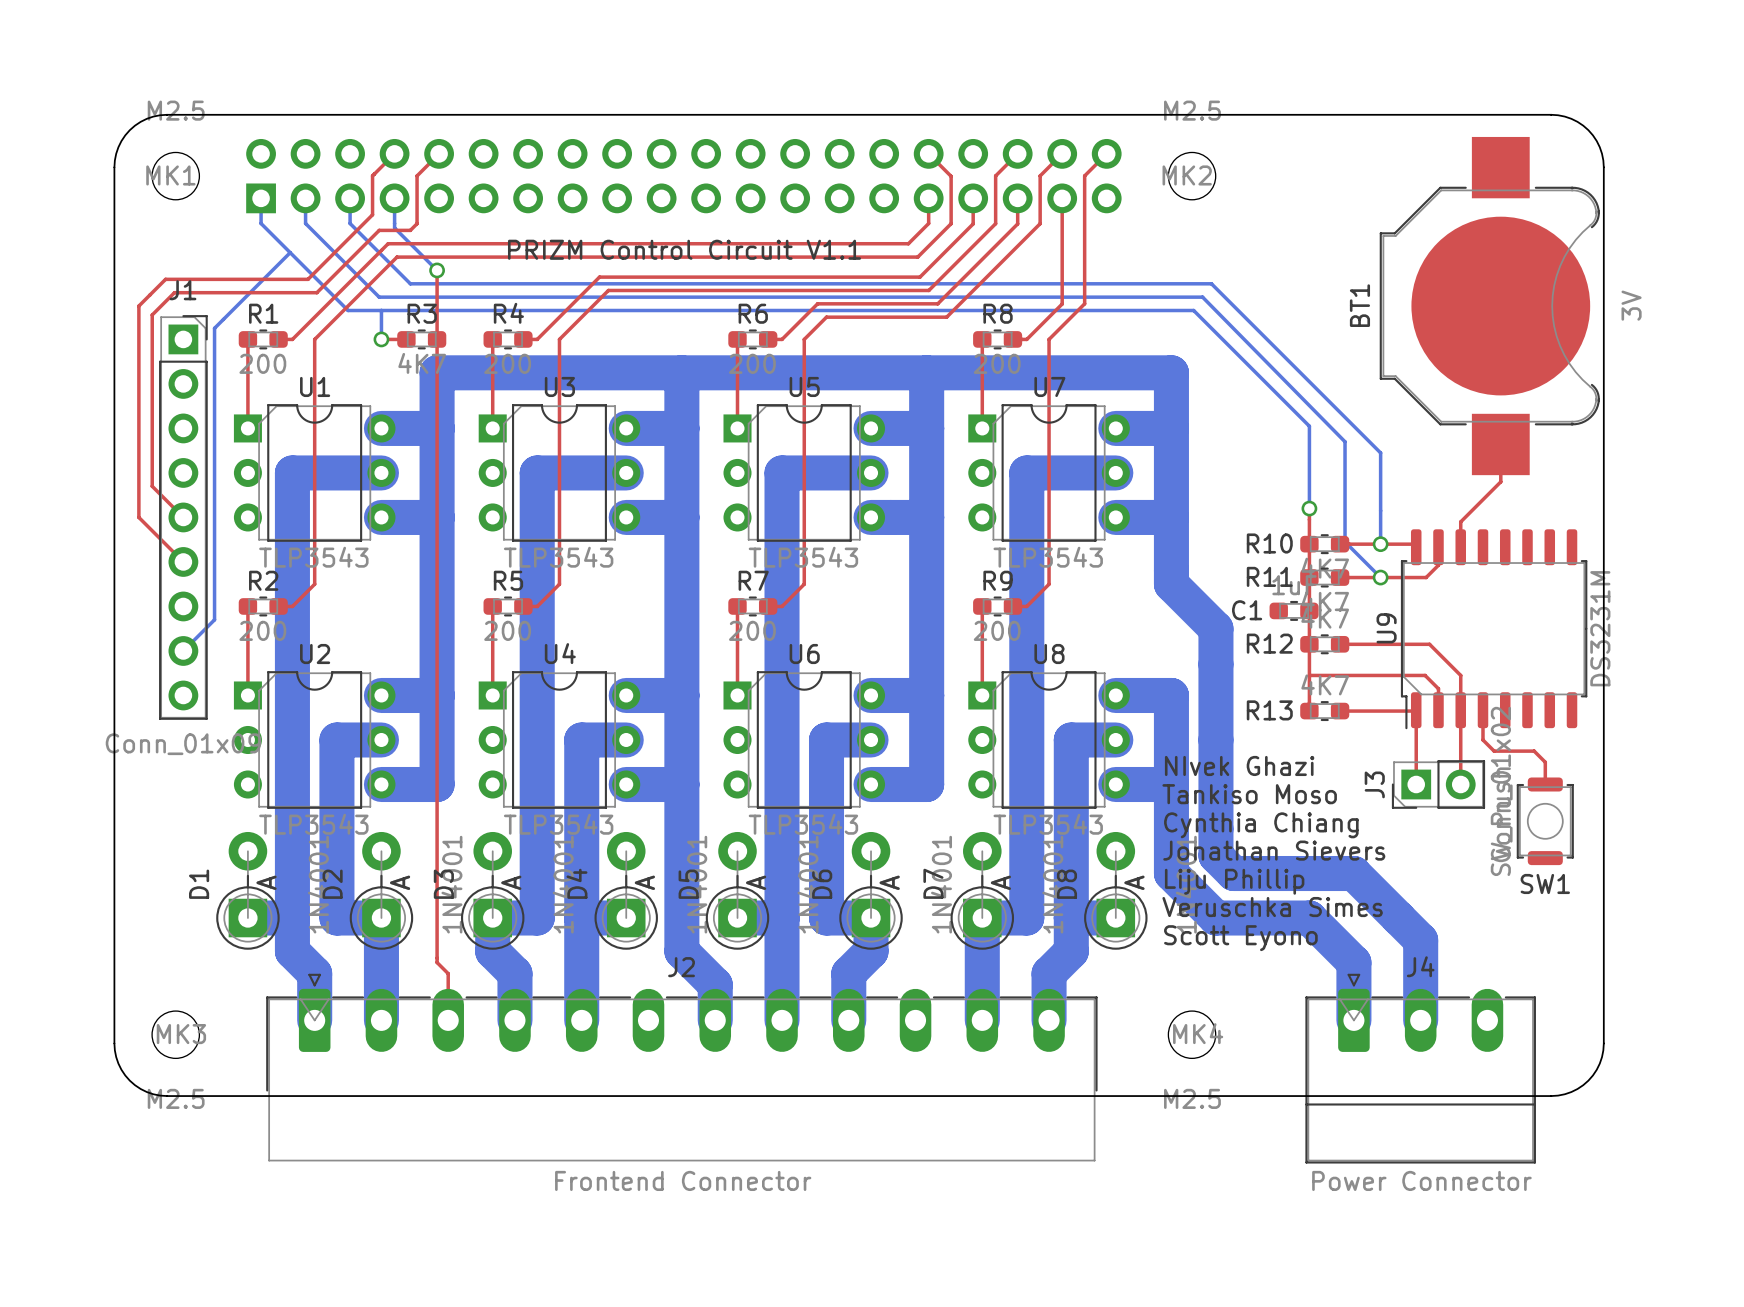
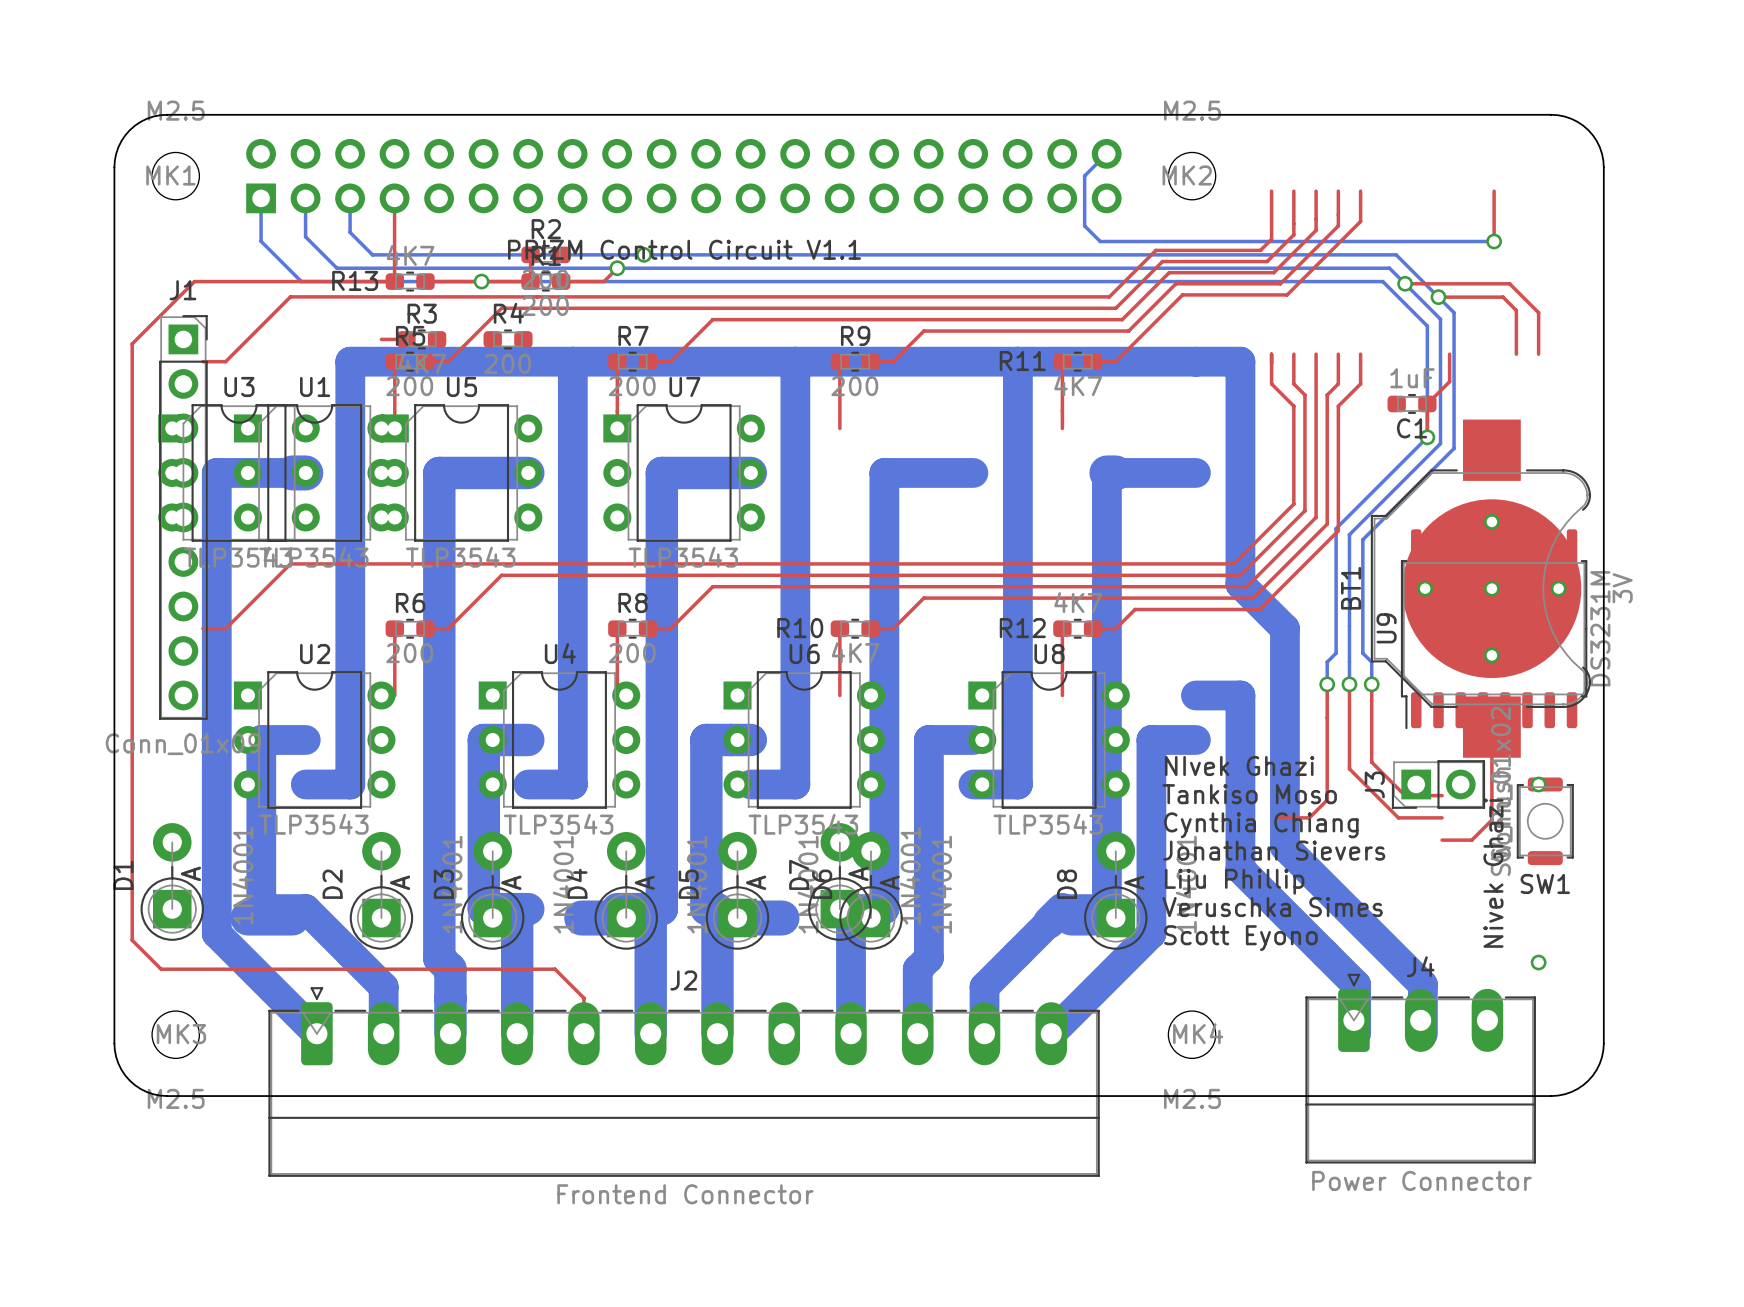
top track: (394, 153) (372, 175) (372, 214) (308, 279) (165, 279) (138, 306) (138, 517) (183, 561) -> none
top track: (439, 153) (417, 175) (417, 223) (410, 230) (379, 230) (316, 292) (174, 292) (152, 314) (152, 486) (183, 517) -> none
top track: (928, 153) (951, 176) (951, 223) (917, 257) (397, 257) (314, 339) (314, 584) (292, 606) (278, 606) -> none
top track: (1017, 153) (995, 175) (995, 223) (928, 290) (608, 290) (559, 339) (559, 584) (537, 606) (523, 606) -> none
top track: (1062, 153) (1040, 175) (1040, 223) (946, 317) (826, 317) (804, 339) (804, 584) (782, 606) (768, 606) -> none
top track: (1106, 153) (1084, 175) (1084, 303) (1049, 339) (1049, 584) (1026, 606) (1012, 606) -> none
bottom track: none -> (1106, 153) (1084, 175) (1084, 225) (1100, 241) (1494, 241)
top track: none -> (1271, 191) (1271, 239) (1260, 250) (1155, 250) (1109, 296) (290, 296) (225, 361) (202, 361)
top track: none -> (1293, 191) (1293, 234) (1267, 261) (1162, 261) (1115, 308) (501, 308) (448, 361) (425, 361)
top track: none -> (1316, 191) (1316, 230) (1273, 272) (1169, 272) (1122, 319) (712, 319) (670, 361) (648, 361)
top track: none -> (1338, 191) (1338, 225) (1280, 283) (1175, 283) (1128, 331) (923, 331) (893, 361) (870, 361)
top track: none -> (1360, 191) (1360, 221) (1287, 294) (1182, 294) (1115, 361) (1093, 361)
top track: none -> (1494, 191) (1494, 241)
top track: none -> (394, 198) (394, 281)
bottom track: (394, 198) (394, 227) (437, 270) -> none
top track: (928, 198) (928, 223) (908, 243) (388, 243) (292, 339) (278, 339) -> none
top track: (973, 198) (973, 223) (919, 277) (599, 277) (537, 339) (523, 339) -> none
top track: (1017, 198) (1017, 223) (937, 303) (817, 303) (782, 339) (768, 339) -> none
top track: (1062, 198) (1062, 304) (1026, 339) (1012, 339) -> none
bottom track: (261, 223) (348, 310) (1193, 310) (1309, 426) (1309, 508) -> (261, 223) (261, 241) (301, 281) (1382, 281) (1427, 326) (1427, 437) (1336, 528) (1336, 653) (1327, 662) (1327, 684)
bottom track: (305, 223) (379, 297) (1202, 297) (1345, 441) (1345, 541) (1380, 577) -> (305, 223) (305, 236) (336, 268) (1389, 268) (1440, 319) (1440, 443) (1349, 534) (1349, 684)
bottom track: (350, 223) (410, 283) (1211, 283) (1380, 452) (1380, 544) -> (350, 223) (350, 232) (372, 254) (1396, 254) (1454, 312) (1454, 448) (1362, 539) (1362, 653) (1371, 662) (1371, 684)
via: none -> (1494, 241)
bottom track: (290, 252) (214, 328) (214, 619) (183, 650) -> none
top track: none -> (530, 254) (530, 281) (425, 281)
via: none -> (644, 254)
top track: none -> (617, 268) (603, 281) (561, 281)
via: none -> (617, 268)
top track: (437, 270) (437, 962) (448, 973) (448, 1020) -> none
via position: (437, 270) -> (481, 281)
top track: none -> (394, 281) (194, 281) (132, 343) (132, 940) (161, 969) (555, 969) (583, 998) (583, 1033)
top track: none -> (1405, 283) (1509, 283) (1538, 312) (1538, 354)
via: none -> (1405, 283)
top track: none -> (1438, 297) (1503, 297) (1516, 310) (1516, 354)
via: none -> (1438, 297)
BT1 position: (1489, 306) -> (1480, 588)
bottom track: (381, 310) (381, 339) -> none
top track: (247, 339) (247, 428) -> none
R1 position: (263, 339) -> (545, 281)
via: (381, 339) -> none
top track: (492, 339) (492, 428) -> none
top track: (737, 339) (737, 428) -> none
R6 position: (752, 339) -> (410, 628)
top track: (982, 339) (982, 428) -> none
R8 position: (997, 339) -> (632, 628)
top track: none -> (1271, 354) (1271, 383) (1293, 406) (1293, 504) (1234, 563) (290, 563) (225, 628) (202, 628)
top track: none -> (1293, 354) (1293, 383) (1304, 395) (1304, 510) (1240, 575) (501, 575) (448, 628) (425, 628)
top track: none -> (1316, 354) (1316, 517) (1246, 586) (712, 586) (670, 628) (648, 628)
top track: none -> (1338, 354) (1338, 383) (1327, 395) (1327, 524) (1253, 598) (923, 598) (893, 628) (870, 628)
top track: none -> (1360, 354) (1360, 383) (1338, 406) (1338, 530) (1259, 609) (1135, 609) (1115, 628) (1093, 628)
top track: none -> (1449, 354) (1449, 381) (1427, 403) (1427, 437)
top track: none -> (394, 361) (394, 428)
bottom track: none -> (572, 361) (572, 784) (528, 784)
top track: none -> (617, 361) (617, 428)
bottom track: none -> (795, 361) (795, 784) (750, 784)
top track: none -> (839, 361) (839, 428)
bottom track: none -> (1017, 361) (1017, 784) (973, 784)
top track: none -> (1062, 361) (1062, 428)
bottom track: (681, 372) (681, 951) (715, 984) (715, 1020) -> none
bottom track: (926, 372) (926, 784) (871, 784) -> none
bottom track: (381, 428) (437, 428) -> none
bottom track: (626, 428) (681, 428) -> none
bottom track: (871, 428) (926, 428) -> none
bottom track: (1115, 428) (1171, 428) -> none
via: none -> (1427, 437)
top track: (1500, 444) (1500, 481) (1460, 521) (1460, 547) -> none
bottom track: (292, 472) (292, 951) (314, 973) (314, 1020) -> (292, 472) (216, 472) (216, 933) (316, 1033)
bottom track: (305, 472) (381, 472) -> none
bottom track: none -> (528, 472) (439, 472) (439, 958) (450, 969) (450, 1033)
U3 position: (559, 472) -> (239, 472)
bottom track: (626, 472) (537, 472) (537, 918) (492, 918) (492, 951) (514, 973) (514, 1020) -> none
bottom track: none -> (750, 472) (661, 472) (661, 909) (617, 909)
U5 position: (804, 472) -> (461, 472)
bottom track: (871, 472) (782, 472) (782, 1020) -> none
bottom track: none -> (973, 472) (884, 472) (884, 909) (850, 909)
U7 position: (1049, 472) -> (684, 472)
bottom track: (1106, 472) (1026, 472) (1026, 918) (982, 918) (982, 1020) -> (1106, 472) (1106, 909) (1062, 909) (984, 987) (984, 1033)
bottom track: none -> (1115, 472) (1195, 472)
top track: (1309, 508) (1309, 711) -> none
via: (1309, 508) -> none
bottom track: (381, 517) (437, 517) -> none
bottom track: (626, 517) (681, 517) -> none
bottom track: (871, 517) (926, 517) -> none
bottom track: (1115, 517) (1171, 517) -> none
via: none -> (1491, 521)
R10 position: (1324, 544) -> (855, 628)
top track: (1340, 544) (1413, 544) (1416, 547) -> none
via: (1380, 544) -> none
top track: (1438, 547) (1438, 565) (1426, 577) (1340, 577) -> none
R11 position: (1324, 577) -> (1077, 361)
via: (1380, 577) -> none
via: none -> (1425, 588)
via: none -> (1491, 588)
via: none -> (1558, 588)
top track: (247, 606) (247, 695) -> none
R2 position: (263, 606) -> (545, 254)
top track: (492, 606) (492, 695) -> none
R5 position: (508, 606) -> (410, 361)
top track: (737, 606) (737, 695) -> none
R7 position: (752, 606) -> (632, 361)
top track: (982, 606) (982, 695) -> none
R9 position: (997, 606) -> (855, 361)
C1 name position: C1 (1247, 610) -> C1 (1412, 428)
C1 position: (1294, 610) -> (1412, 403)
top track: none -> (394, 628) (394, 695)
top track: none -> (617, 628) (617, 695)
top track: none -> (839, 628) (839, 695)
top track: none -> (1062, 628) (1062, 695)
R12 position: (1324, 644) -> (1077, 628)
top track: (1340, 644) (1429, 644) (1460, 675) (1460, 784) -> none
via: none -> (1491, 655)
top track: (1309, 675) (1425, 675) (1438, 688) (1438, 710) -> none
top track: none -> (1327, 684) (1327, 800) (1309, 817) (1279, 817)
via: none -> (1327, 684)
top track: none -> (1349, 684) (1349, 768) (1398, 817) (1442, 817)
via: none -> (1349, 684)
top track: none -> (1371, 684) (1371, 762) (1405, 795) (1442, 795)
via: none -> (1371, 684)
bottom track: (381, 695) (437, 695) -> none
bottom track: (626, 695) (681, 695) -> none
bottom track: (871, 695) (926, 695) -> none
bottom track: (1115, 695) (1171, 695) (1171, 873) (1215, 918) (1309, 918) (1353, 962) (1353, 1020) -> none
bottom track: none -> (1195, 695) (1240, 695) (1240, 869) (1356, 984) (1356, 1033)
top track: (1416, 710) (1416, 784) -> none
top track: (1416, 710) (1340, 711) -> none
top track: (1482, 710) (1482, 739) (1494, 751) (1534, 751) (1545, 762) (1545, 784) -> none
R13 position: (1324, 711) -> (410, 281)
top track: none -> (1491, 727) (1491, 820) (1471, 840) (1442, 840)
bottom track: none -> (305, 739) (261, 739) (261, 909) (305, 909) (383, 987) (383, 1033)
bottom track: (381, 739) (336, 739) (336, 918) (381, 918) (381, 1020) -> none
bottom track: none -> (528, 739) (483, 739) (483, 909) (528, 909)
bottom track: (626, 739) (581, 739) (581, 1020) -> none
bottom track: none -> (750, 739) (706, 739) (706, 909) (717, 909) (717, 1033)
bottom track: (871, 739) (826, 739) (826, 918) (871, 918) (871, 951) (848, 973) (848, 1020) -> none
bottom track: none -> (973, 739) (928, 739) (928, 958) (917, 969) (917, 1033)
bottom track: (1115, 739) (1071, 739) (1071, 951) (1049, 973) (1049, 1020) -> none
bottom track: none -> (1195, 739) (1151, 739) (1151, 933) (1051, 1033)
bottom track: none -> (305, 784) (350, 784) (350, 361) (1240, 361) (1240, 584) (1284, 628) (1284, 846) (1422, 984) (1422, 1033)
bottom track: (381, 784) (437, 784) (437, 372) (1171, 372) (1171, 584) (1215, 628) (1215, 855) (1233, 873) (1353, 873) (1420, 940) (1420, 1020) -> none
bottom track: (626, 784) (681, 784) -> none
bottom track: (1115, 784) (1171, 784) -> none
via: none -> (1538, 784)
text: none -> Nivek Ghazi (1493, 873)
D7 name position: D7 (933, 883) -> D7 (799, 874)
D1 position: (247, 890) -> (172, 881)
D7 position: (982, 890) -> (839, 881)
bottom track: none -> (517, 909) (517, 1033)
bottom track: none -> (650, 909) (650, 1033)
bottom track: none -> (850, 909) (850, 1033)
via: none -> (1538, 962)
J2 footprint: [266, 973, 1098, 1162] -> [268, 987, 1100, 1177]

